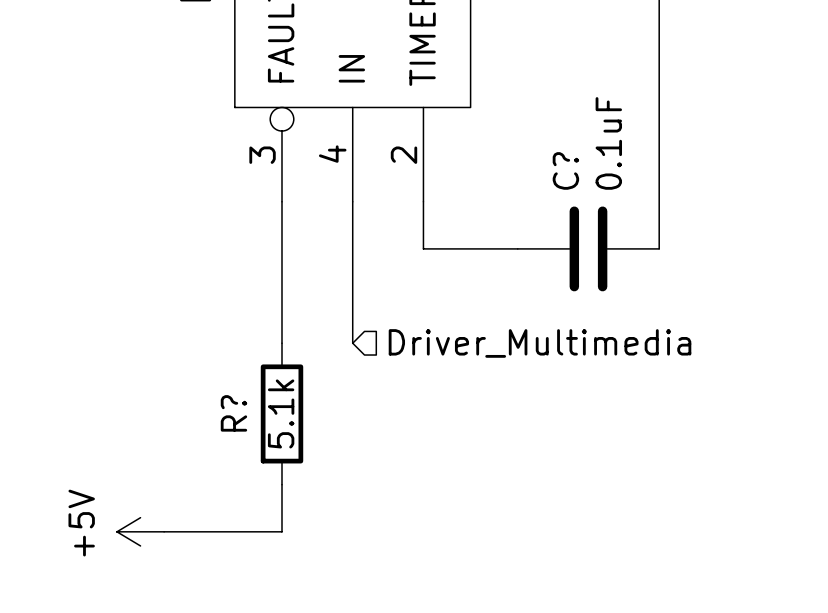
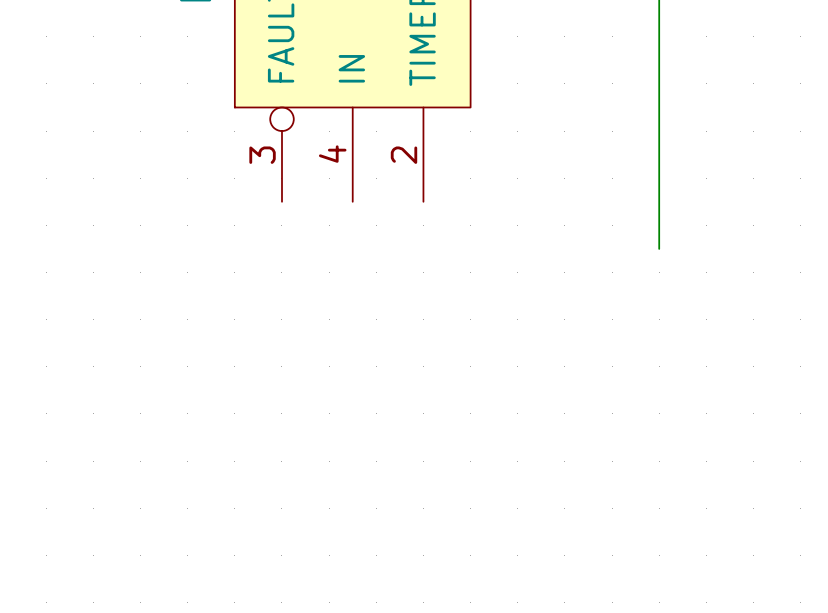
wire: (281, 201) (281, 343) -> none
wire: (352, 201) (352, 343) -> none
wire: (423, 201) (423, 248) (517, 248) -> none
C?: 0.1uF (588, 248) -> none
hierarchical label: Driver_Multimedia (540, 343) -> none
R?: 5.1k (281, 413) -> none
wire: (281, 484) (281, 531) (164, 531) -> none
power symbol: +5V (140, 531) -> none

